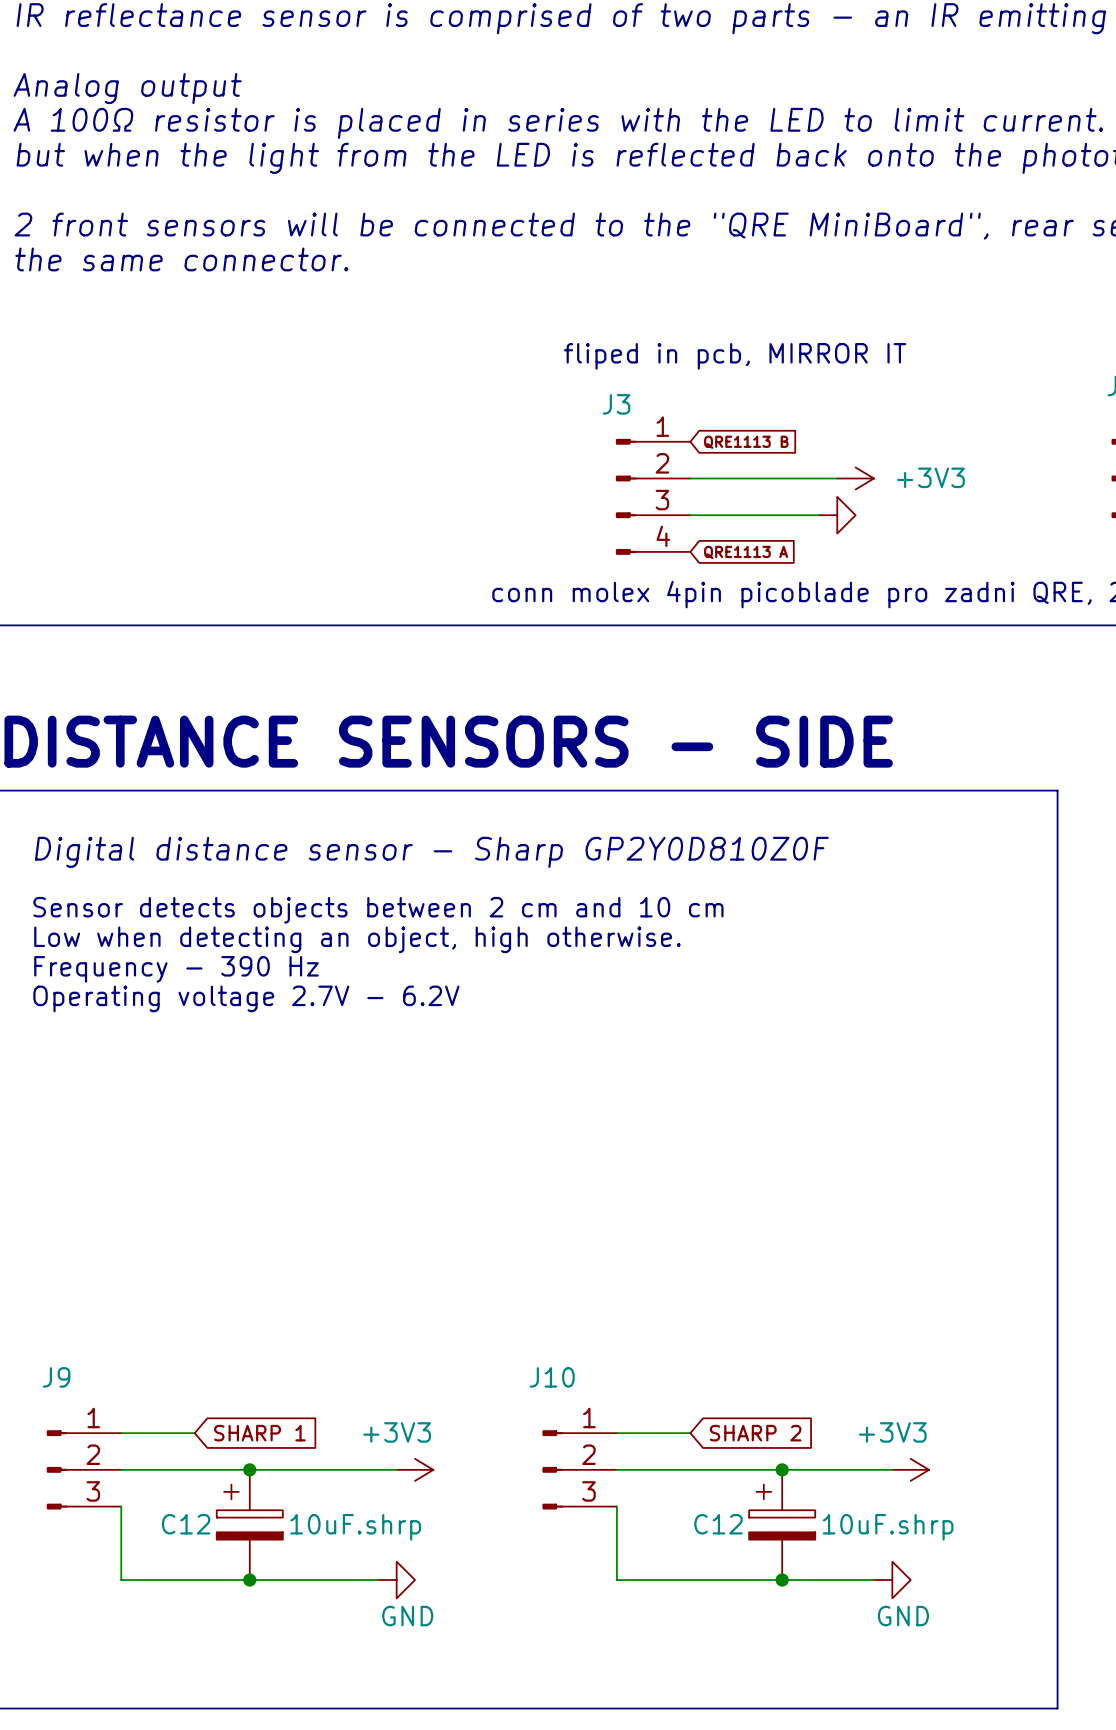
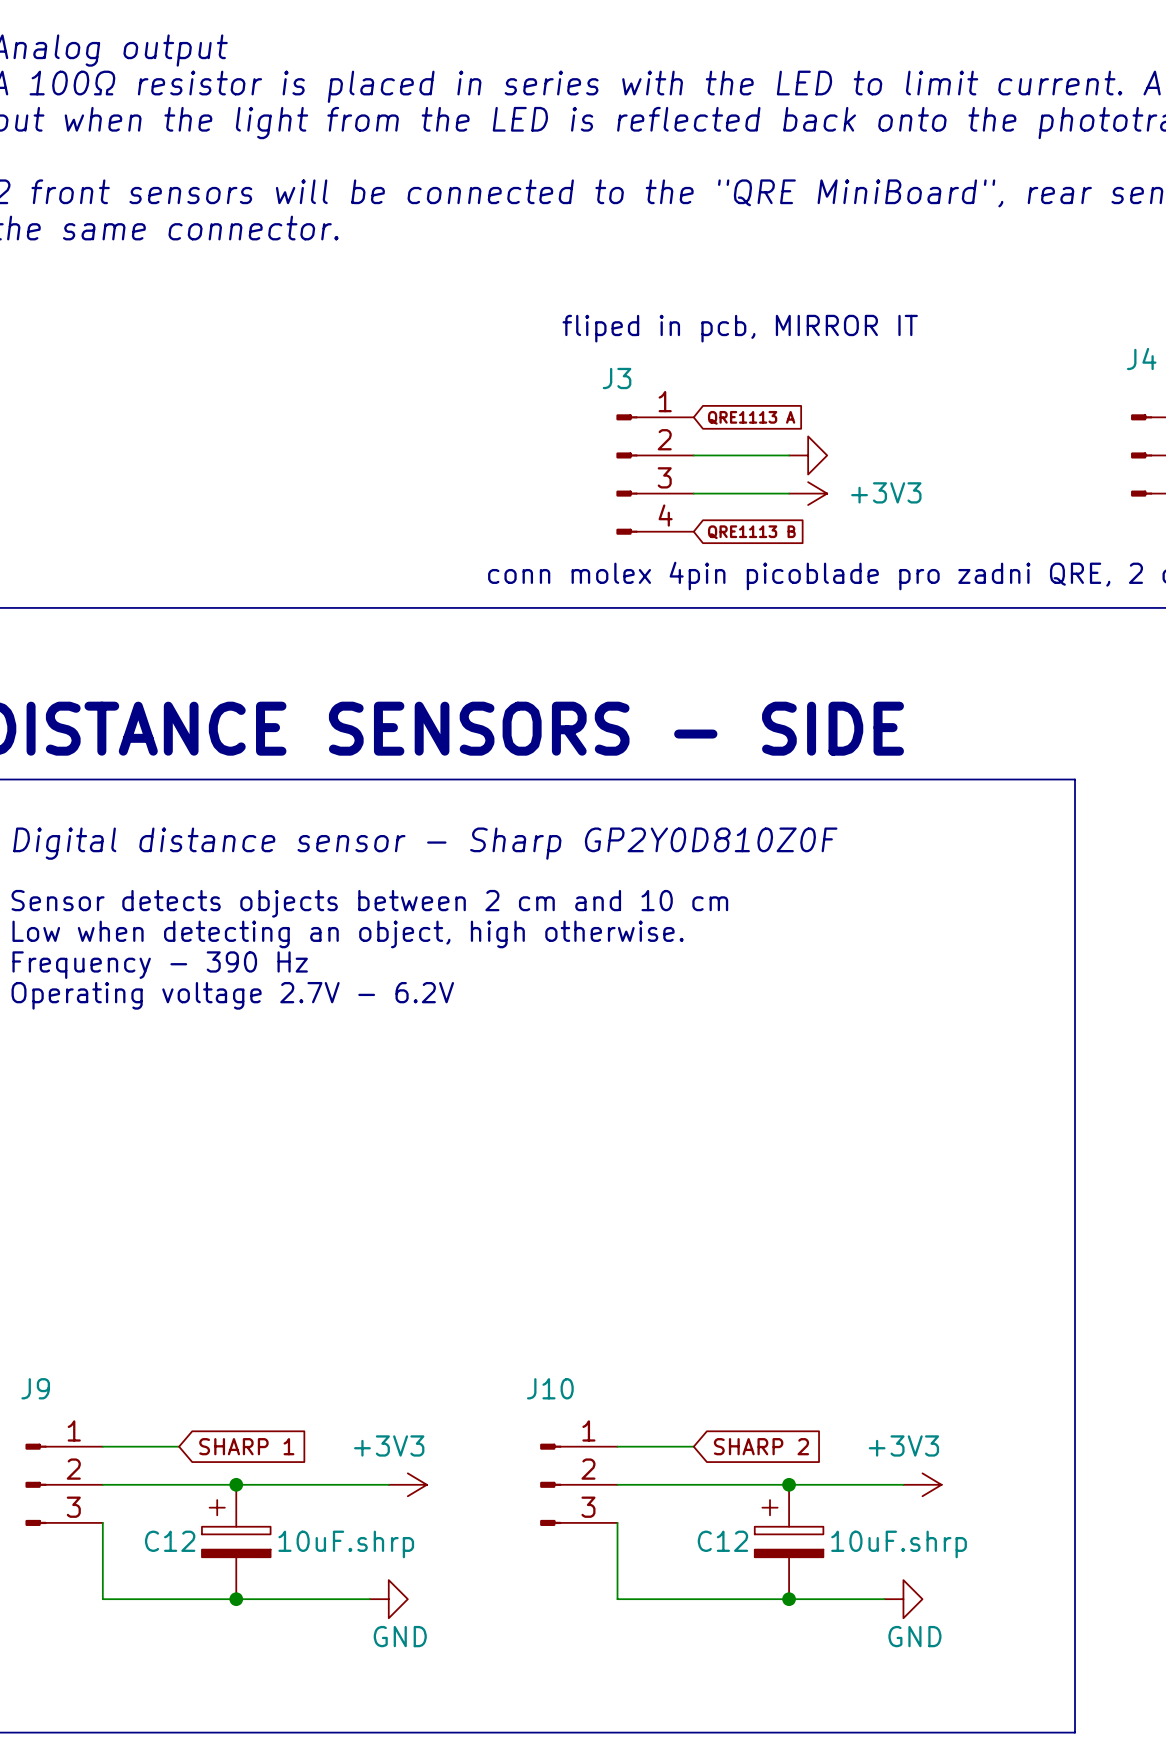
global label: QRE1113 B (746, 442) -> QRE1113 A (751, 417)
wire: (782, 478) (837, 478) -> none
power symbol position: +3V3 (855, 478) -> +3V3 (808, 493)
power symbol position: (837, 515) -> (808, 455)
global label: QRE1113 A (746, 552) -> QRE1113 B (751, 532)

